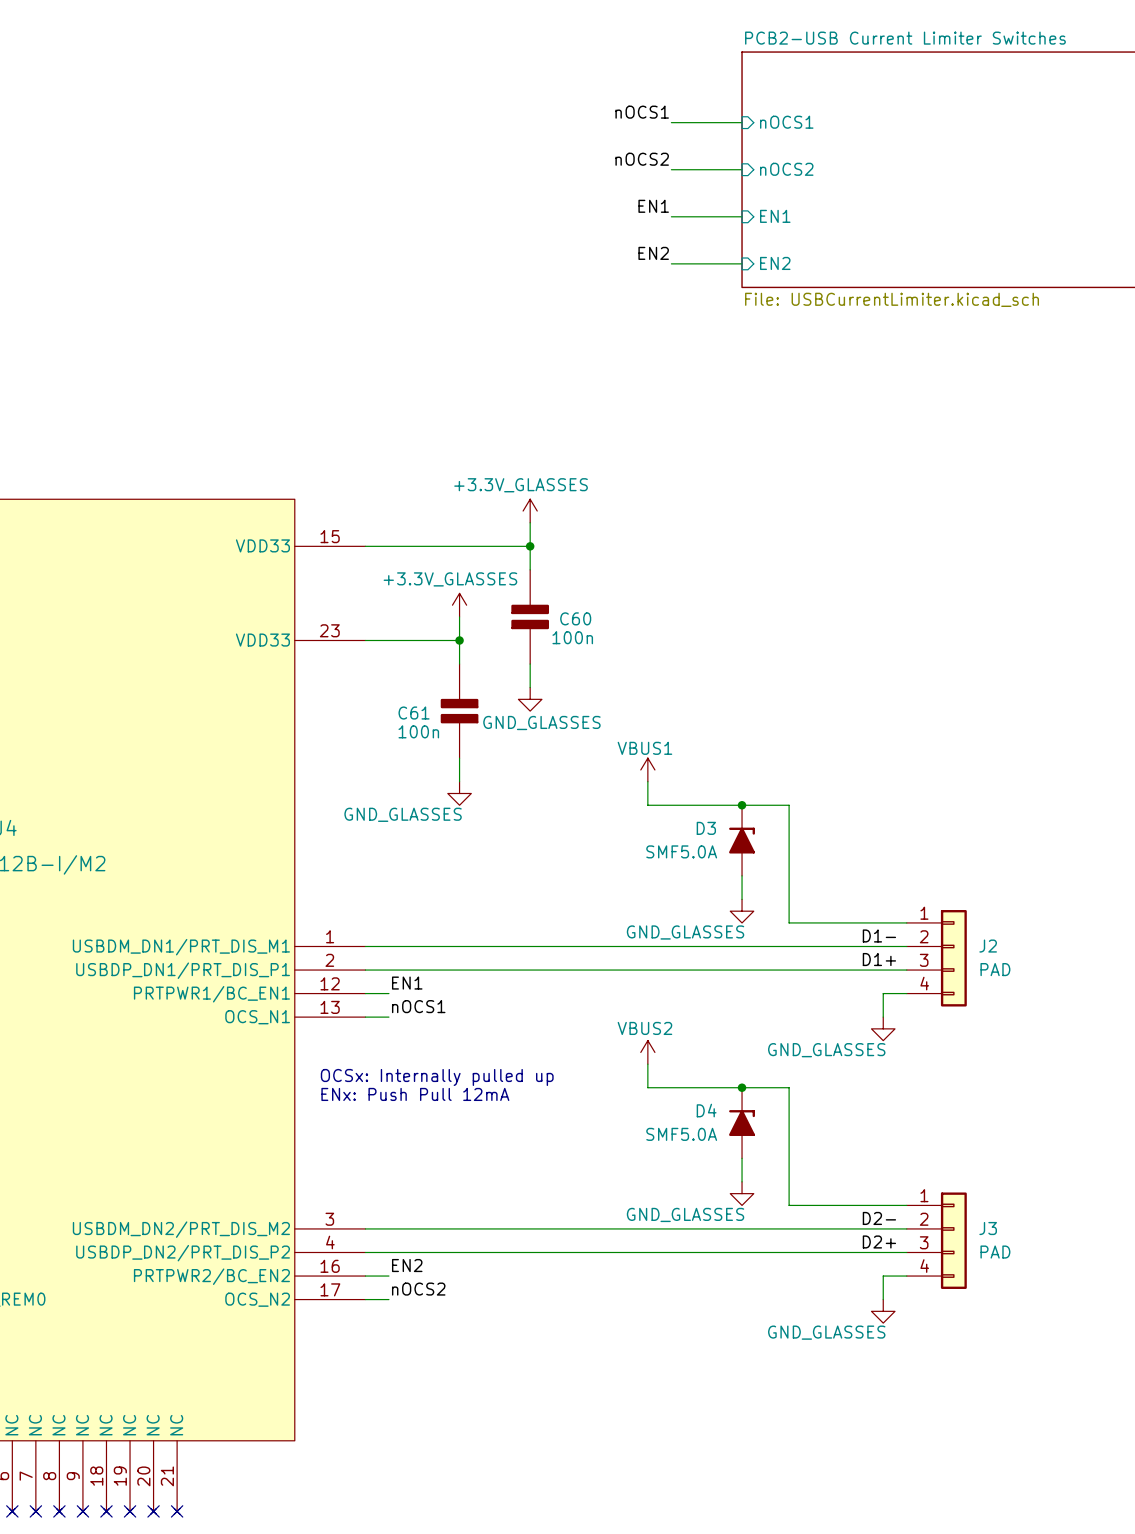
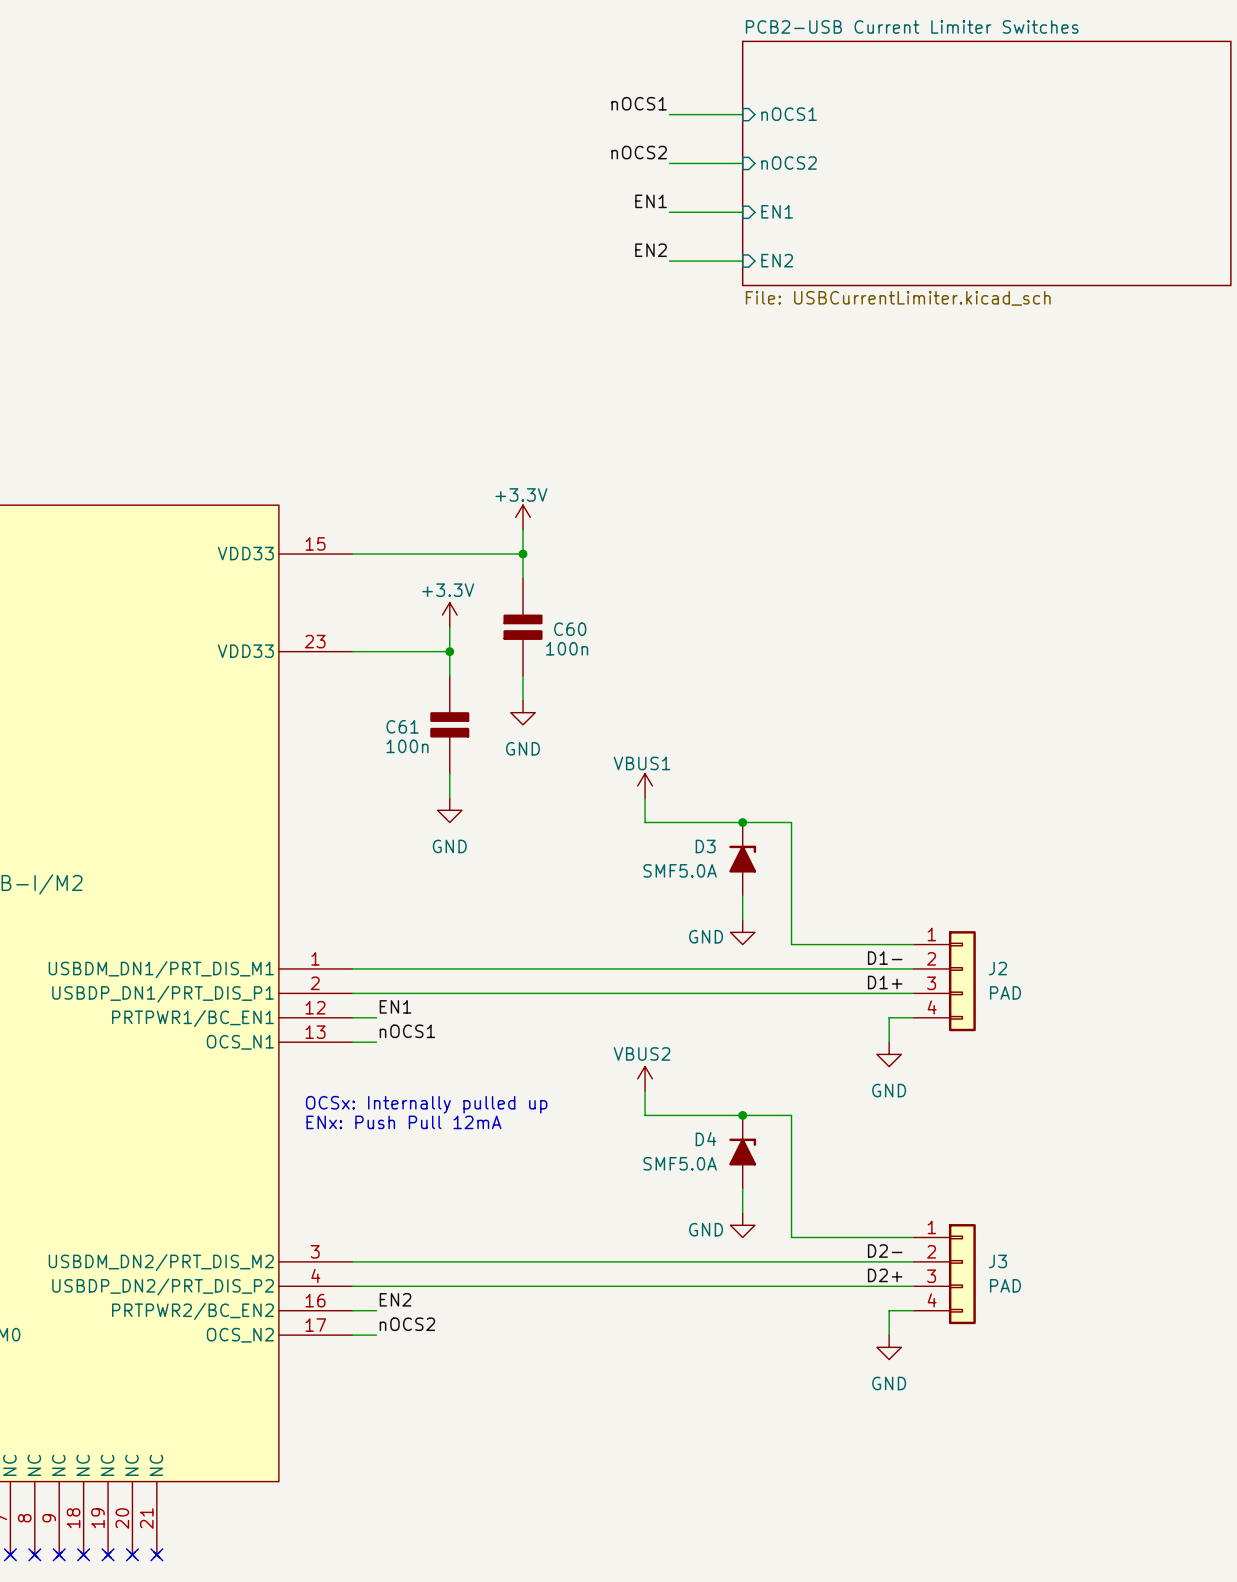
power symbol: +3.3V_GLASSES (530, 511) -> +3.3V (523, 517)
power symbol: +3.3V_GLASSES (459, 605) -> +3.3V (449, 615)
power symbol: GND_GLASSES (530, 699) -> GND (523, 712)
power symbol: GND_GLASSES (459, 793) -> GND (449, 810)
power symbol: GND_GLASSES (742, 911) -> GND (742, 932)
power symbol: GND_GLASSES (883, 1028) -> GND (889, 1054)
power symbol: GND_GLASSES (742, 1193) -> GND (742, 1225)
power symbol: GND_GLASSES (883, 1311) -> GND (889, 1347)

